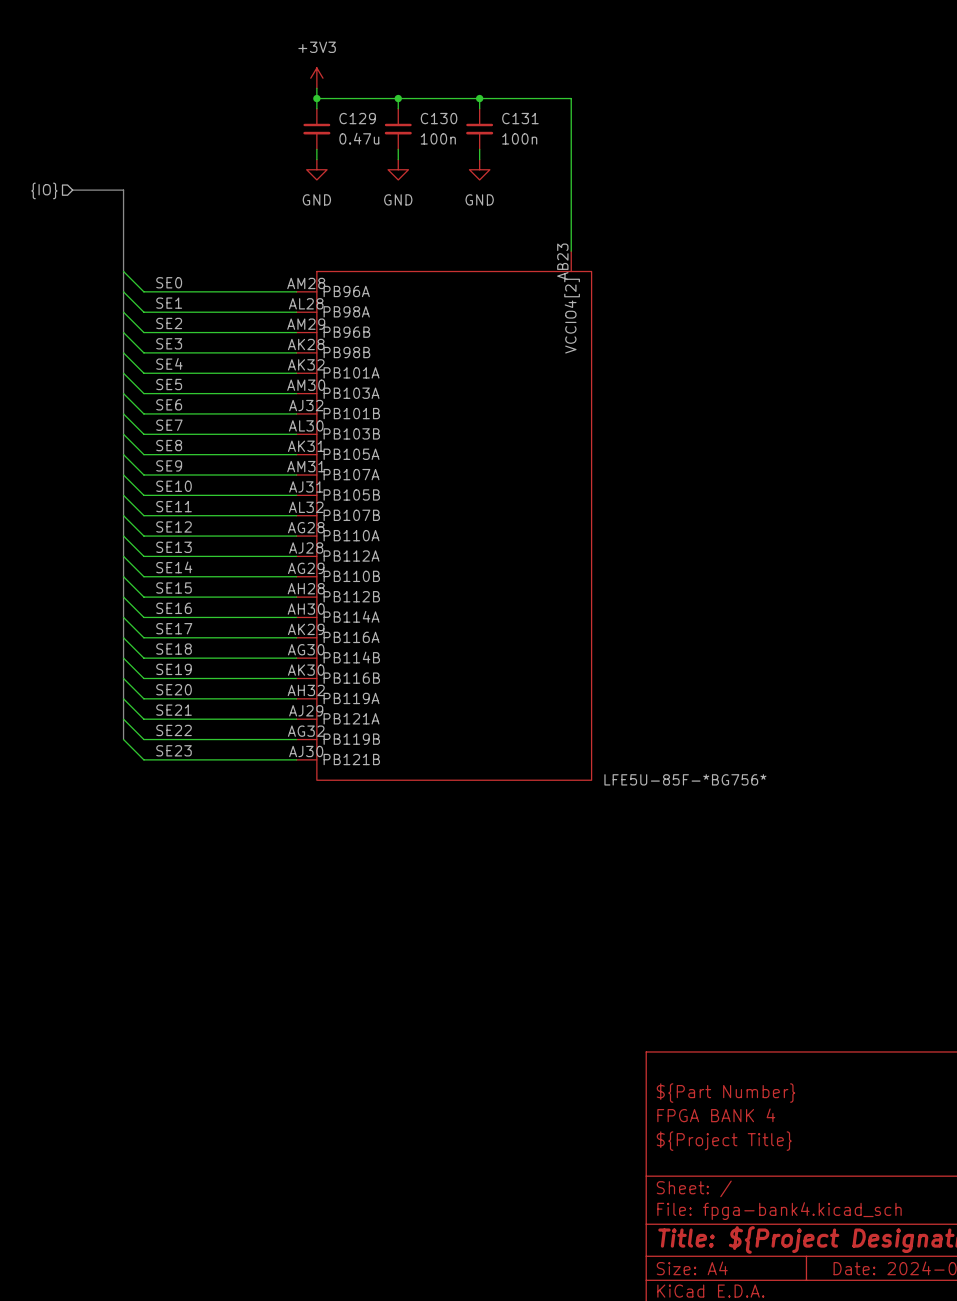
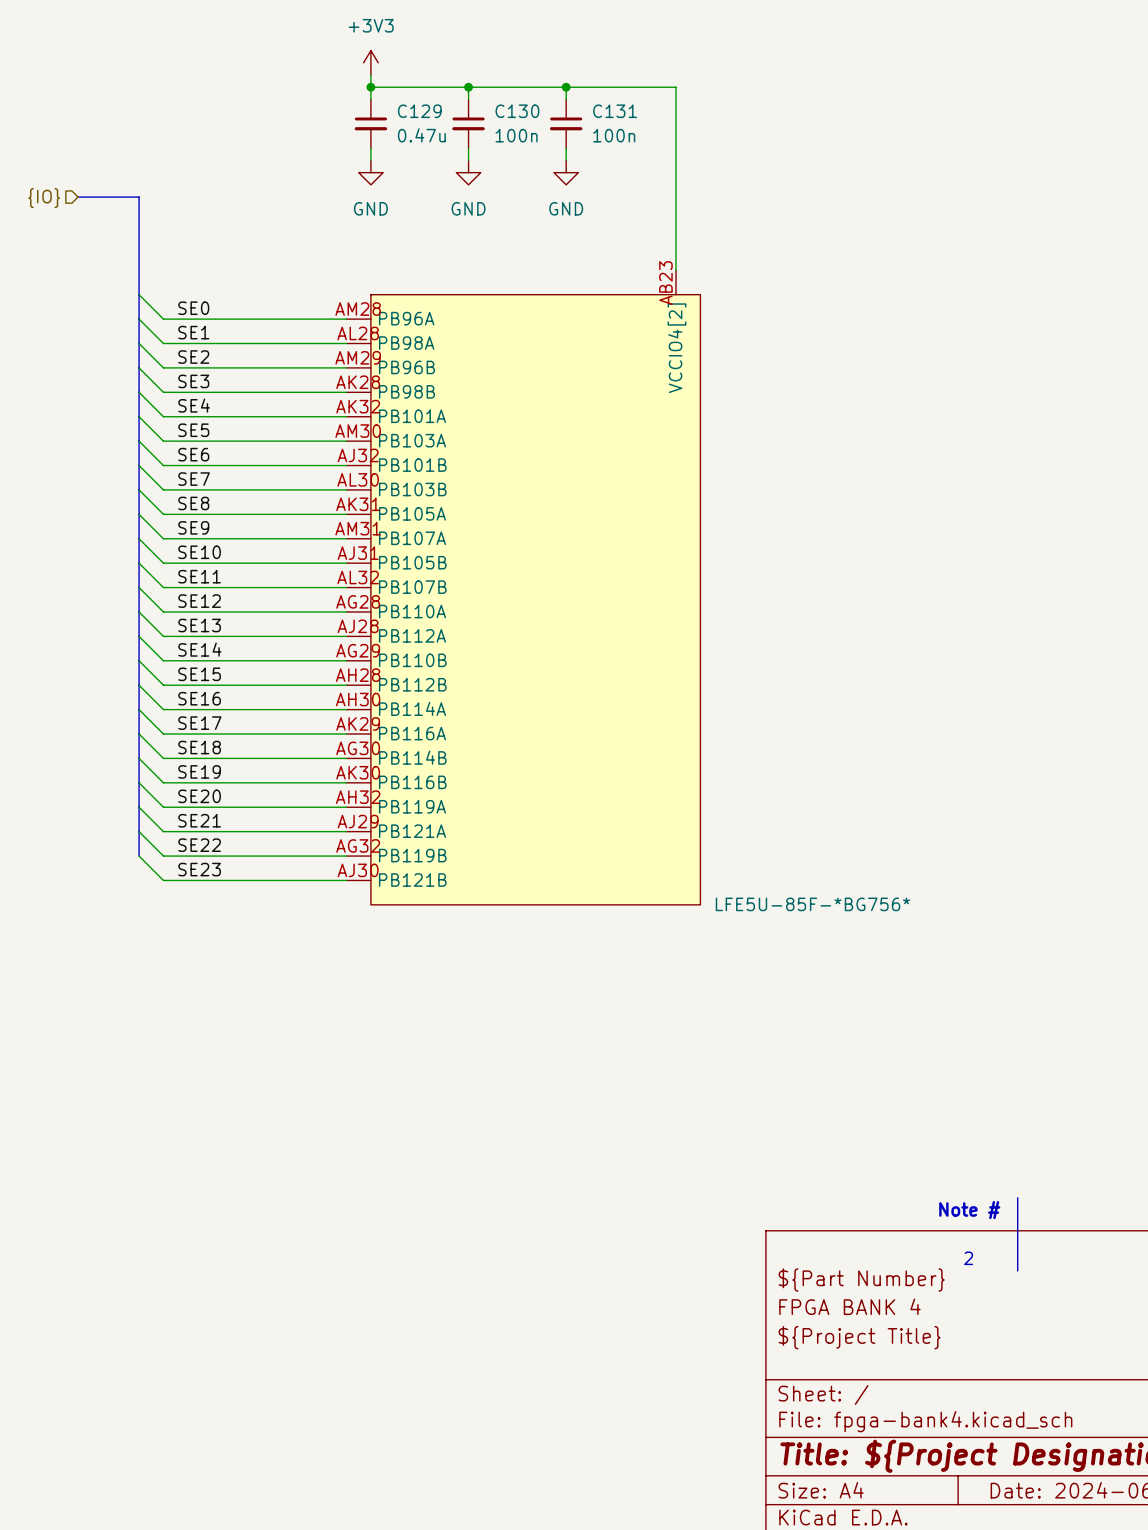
line: none -> (1017, 1197) (1017, 1270)
text: none -> Note # (969, 1210)
text: none -> 2 (968, 1258)

